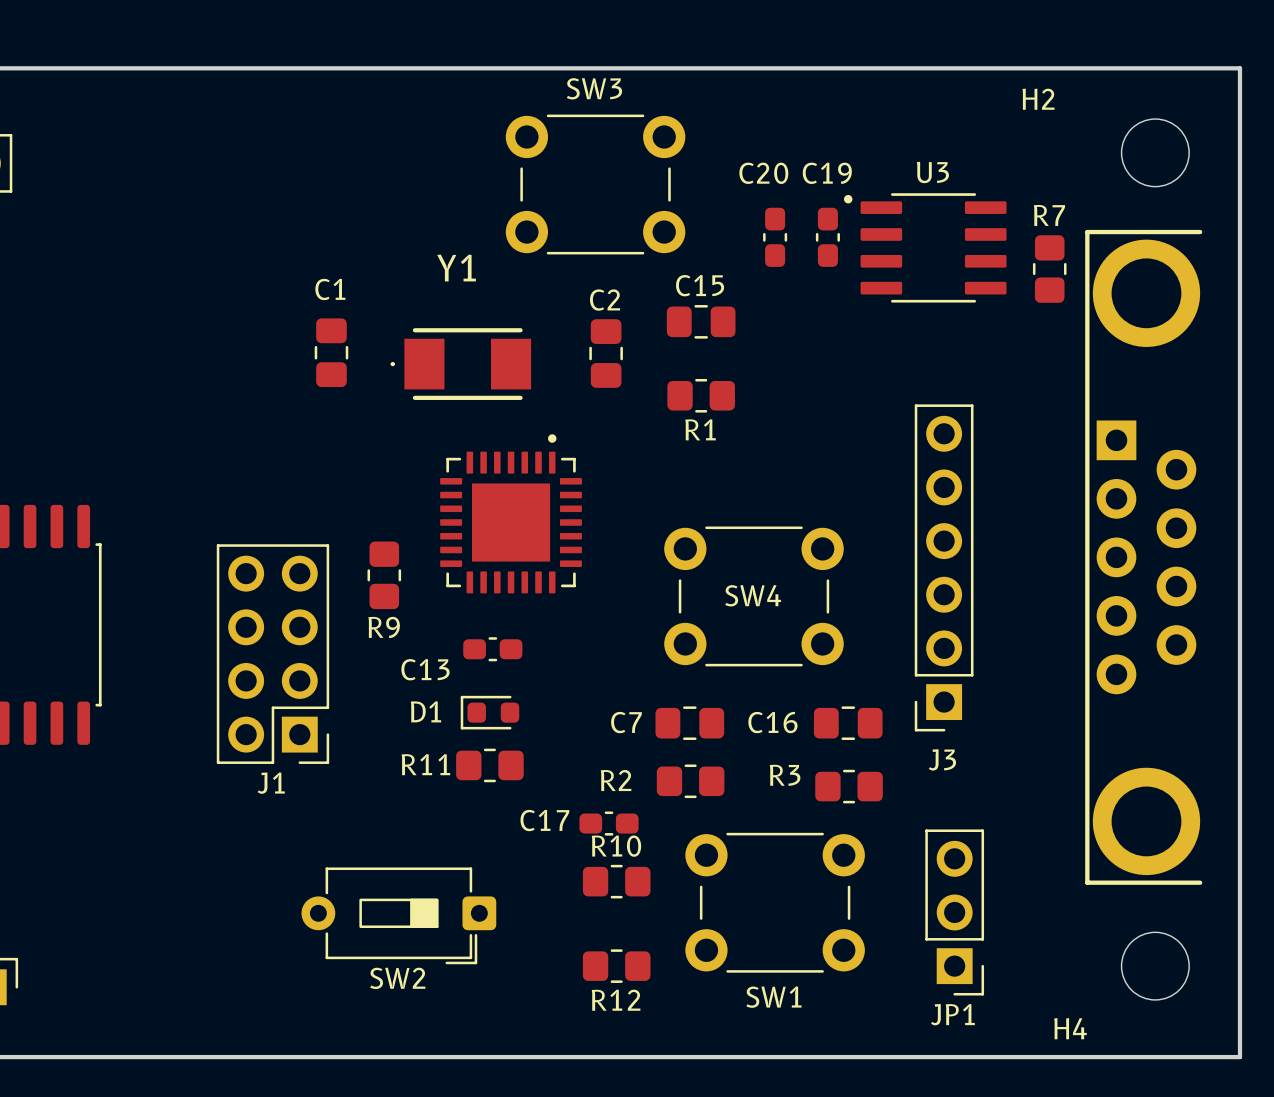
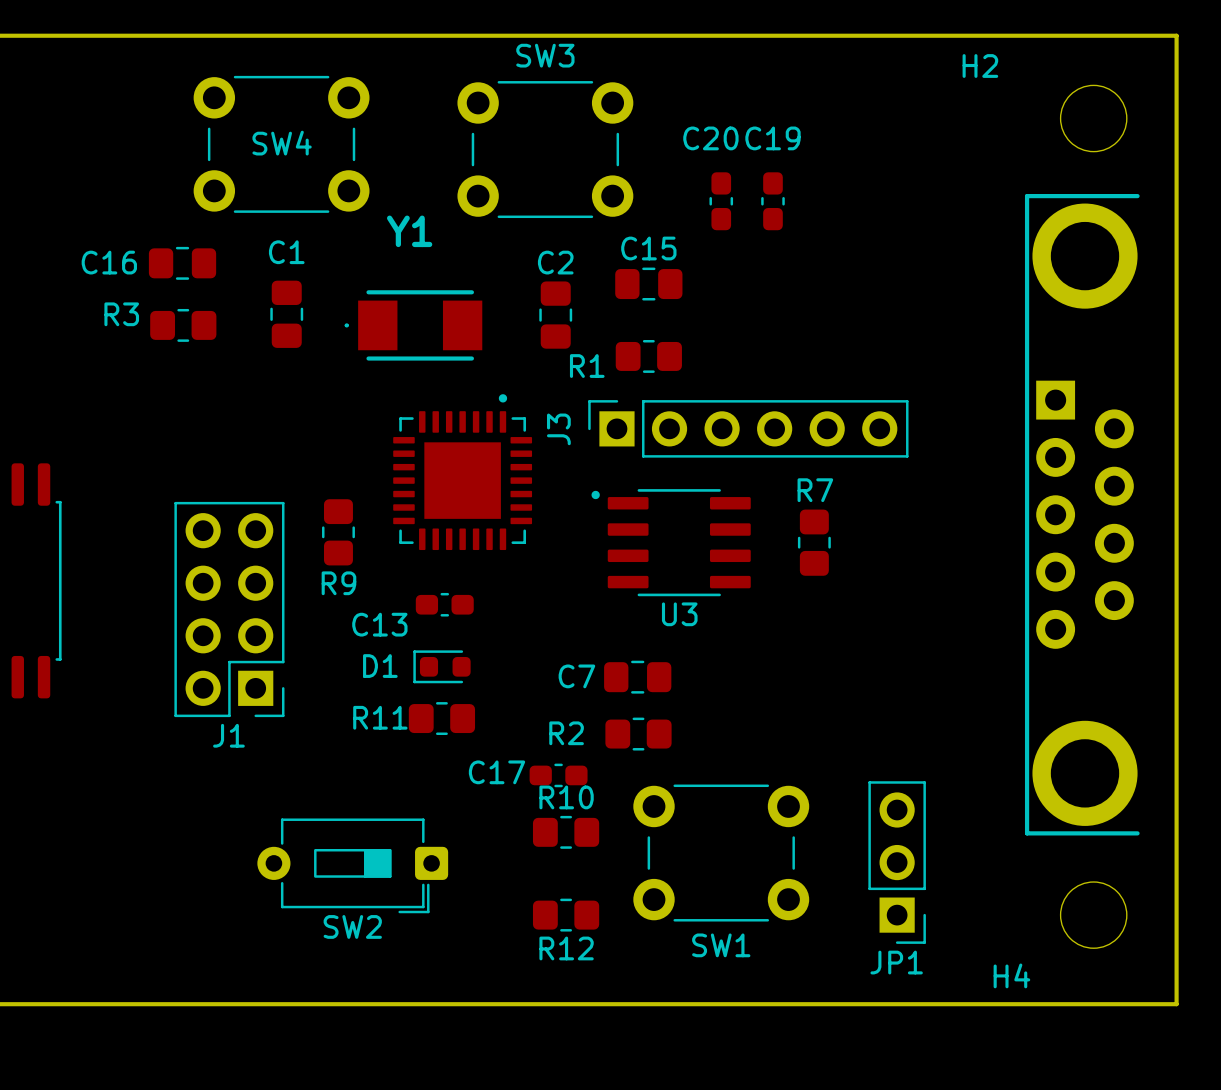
U3 name position: U3 (932, 172) -> U3 (679, 614)
U3 position: (925, 247) -> (671, 542)
R7 position: (1049, 269) -> (814, 542)
R1 name position: R1 (700, 429) -> R1 (587, 366)
J3 rotation: 0° (944, 567) -> 90° clockwise (748, 428)
SW4 position: (753, 596) -> (281, 144)
C16 position: (848, 723) -> (182, 263)
R3 position: (849, 786) -> (183, 325)

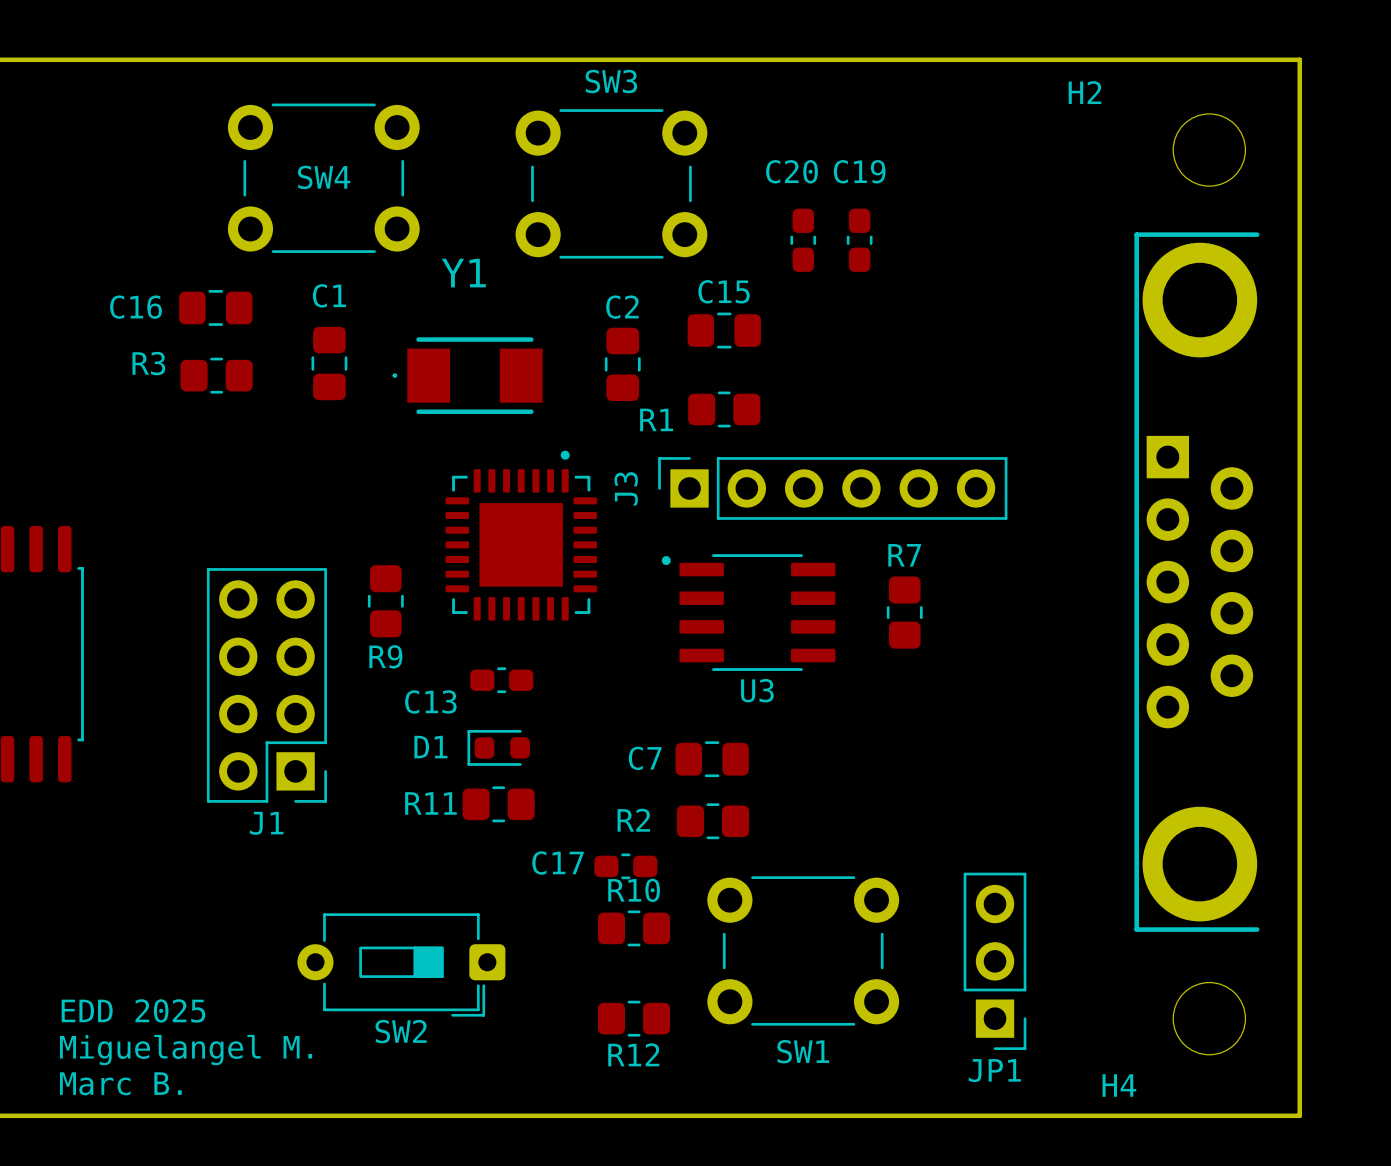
text: none -> EDD 2025 (133, 1010)
text: none -> Miguelangel M. (186, 1050)
text: none -> Marc B. (120, 1083)

